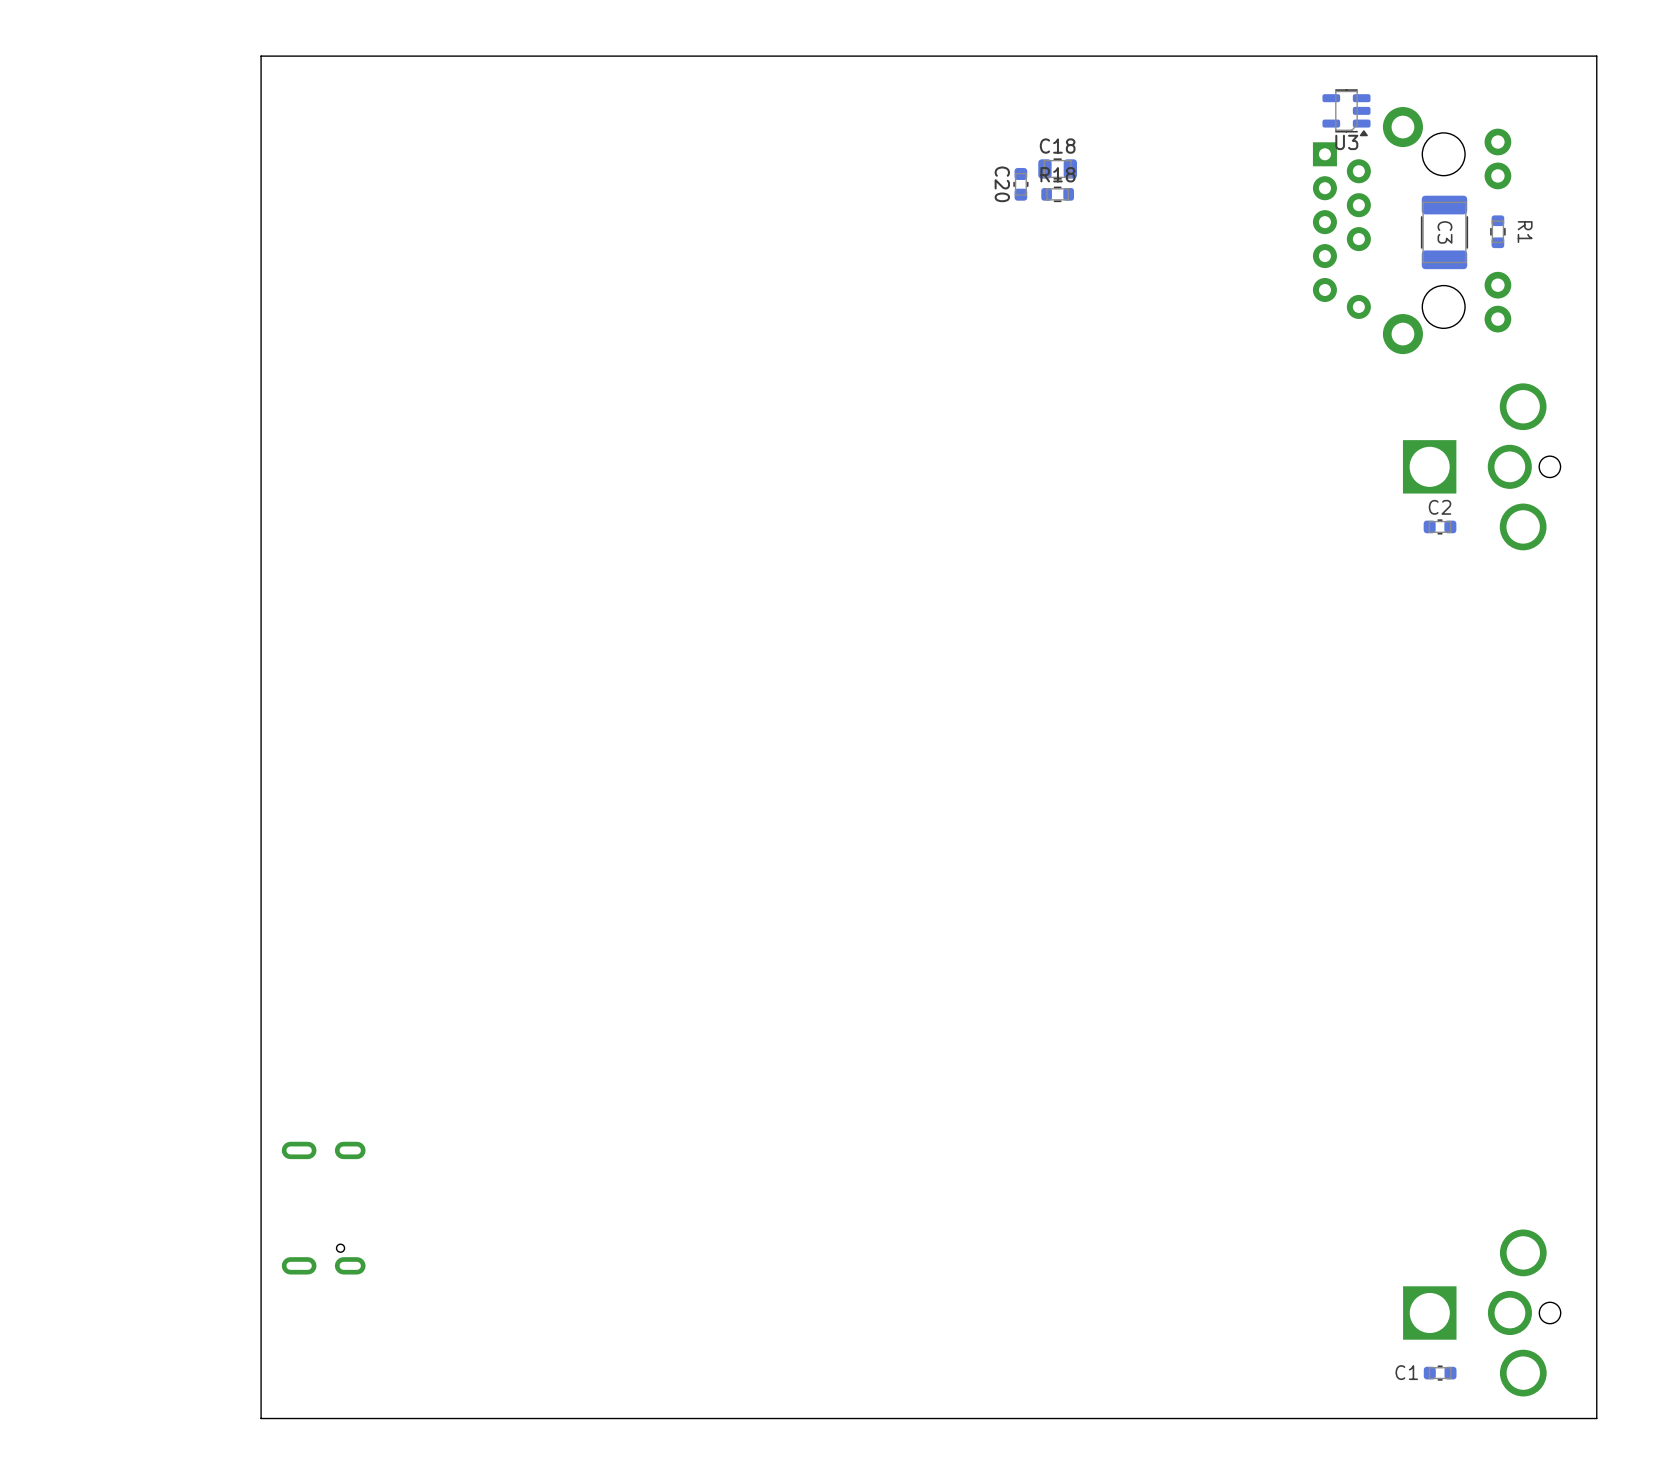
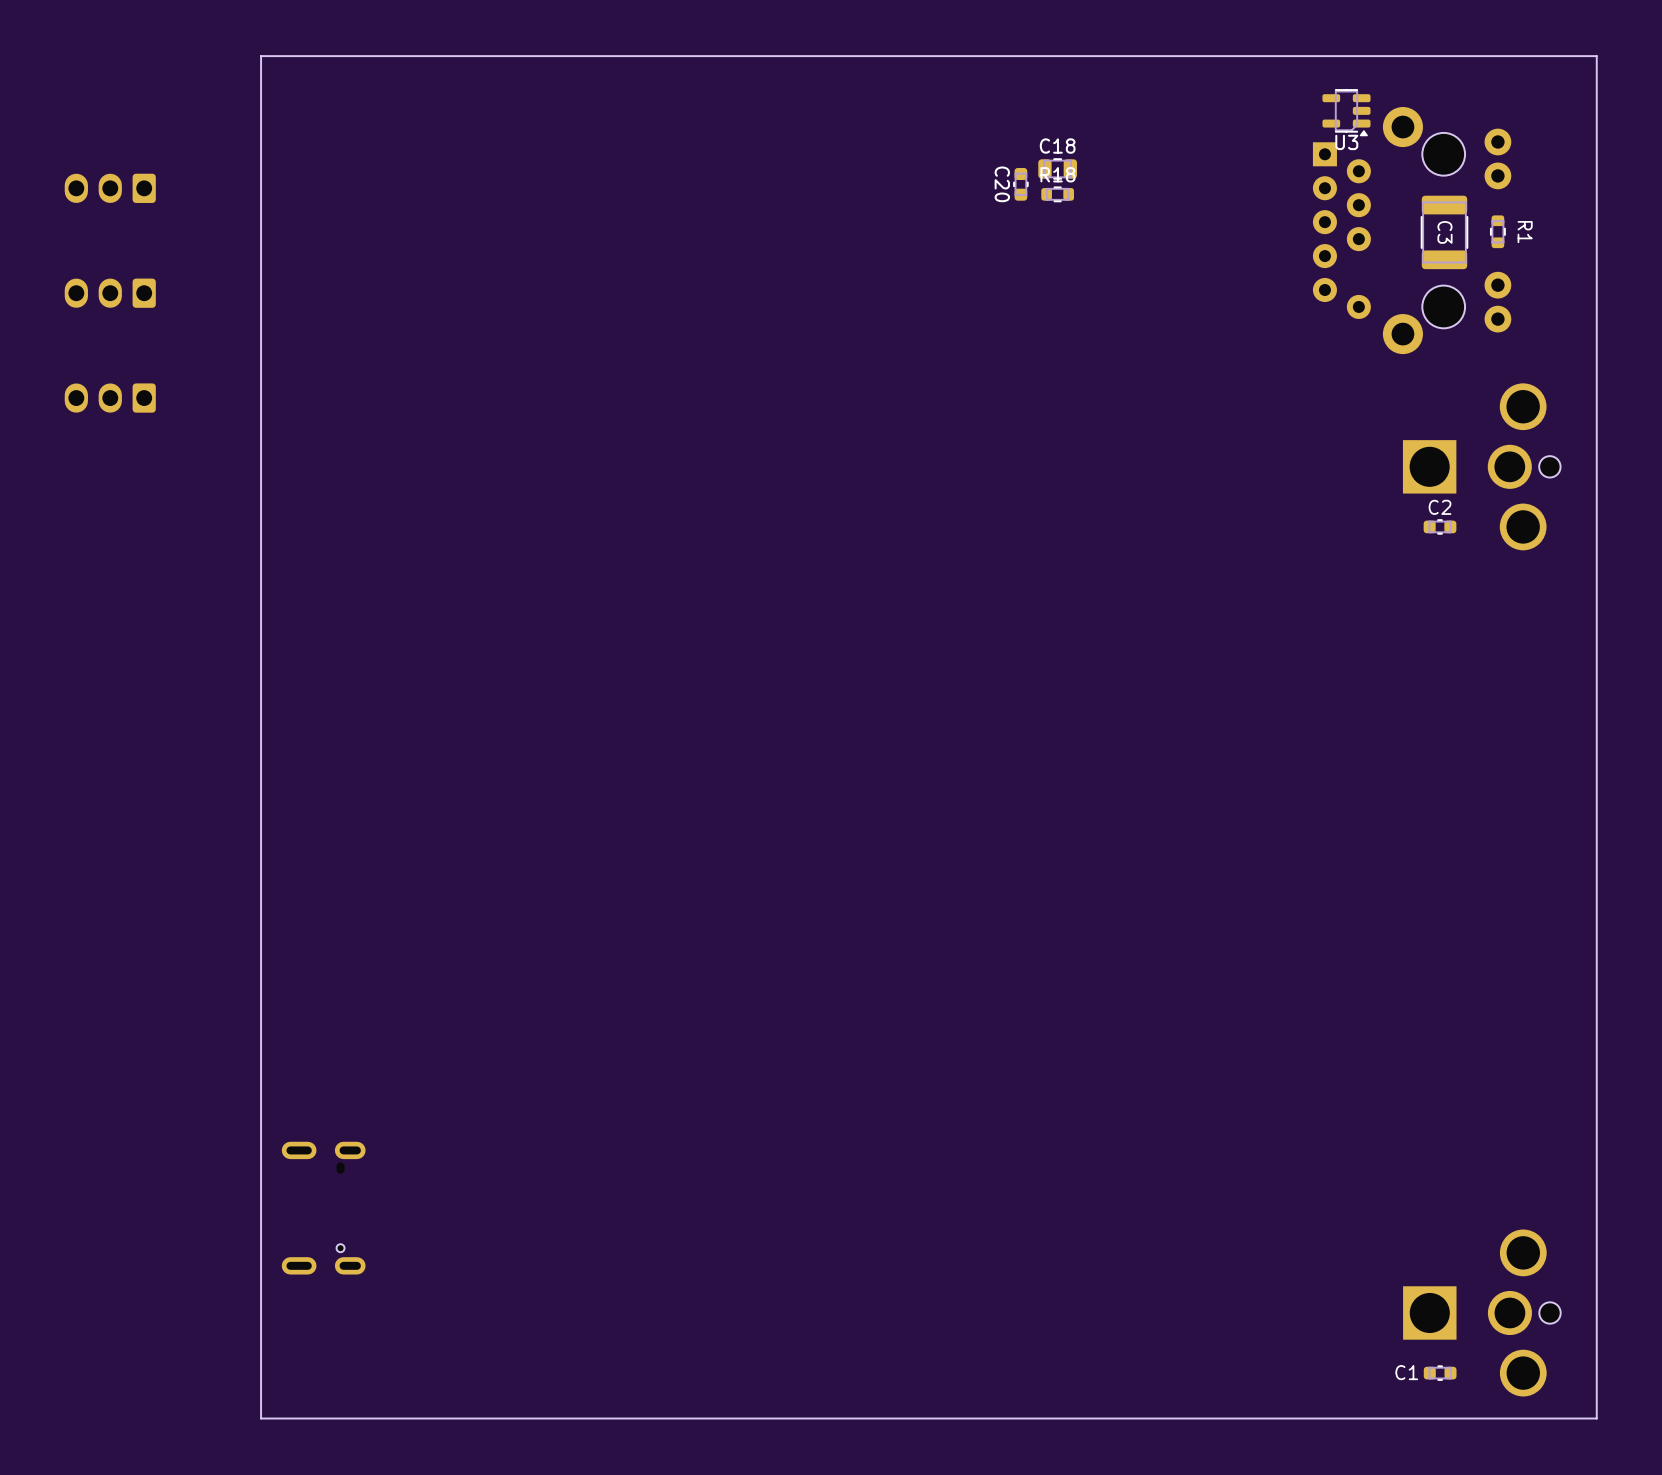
part: none -> (110, 188)
part: none -> (110, 293)
part: none -> (110, 398)

